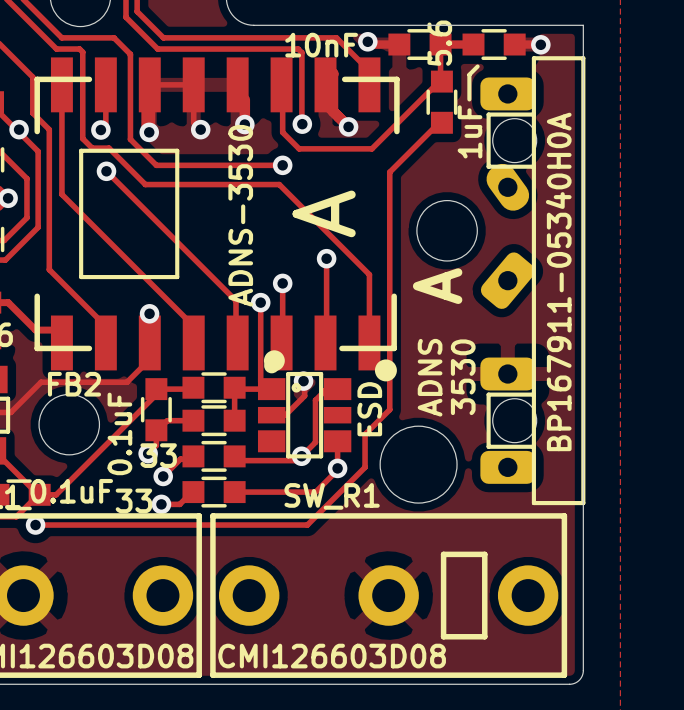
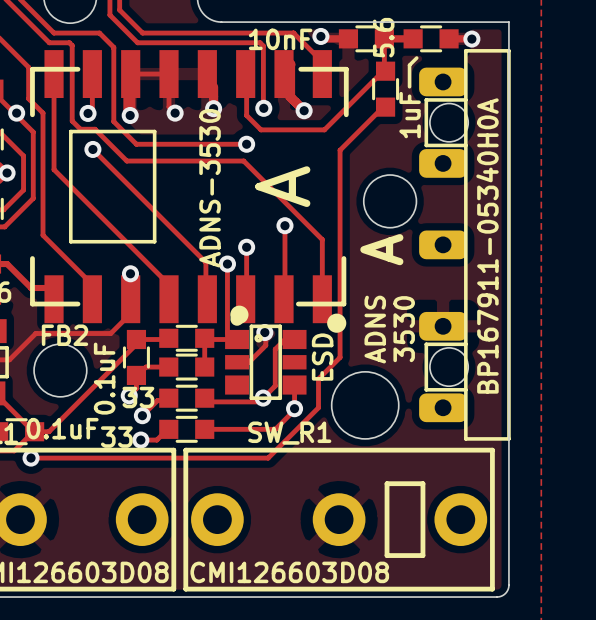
part footprint: [480, 56, 586, 506] -> [419, 49, 511, 441]

